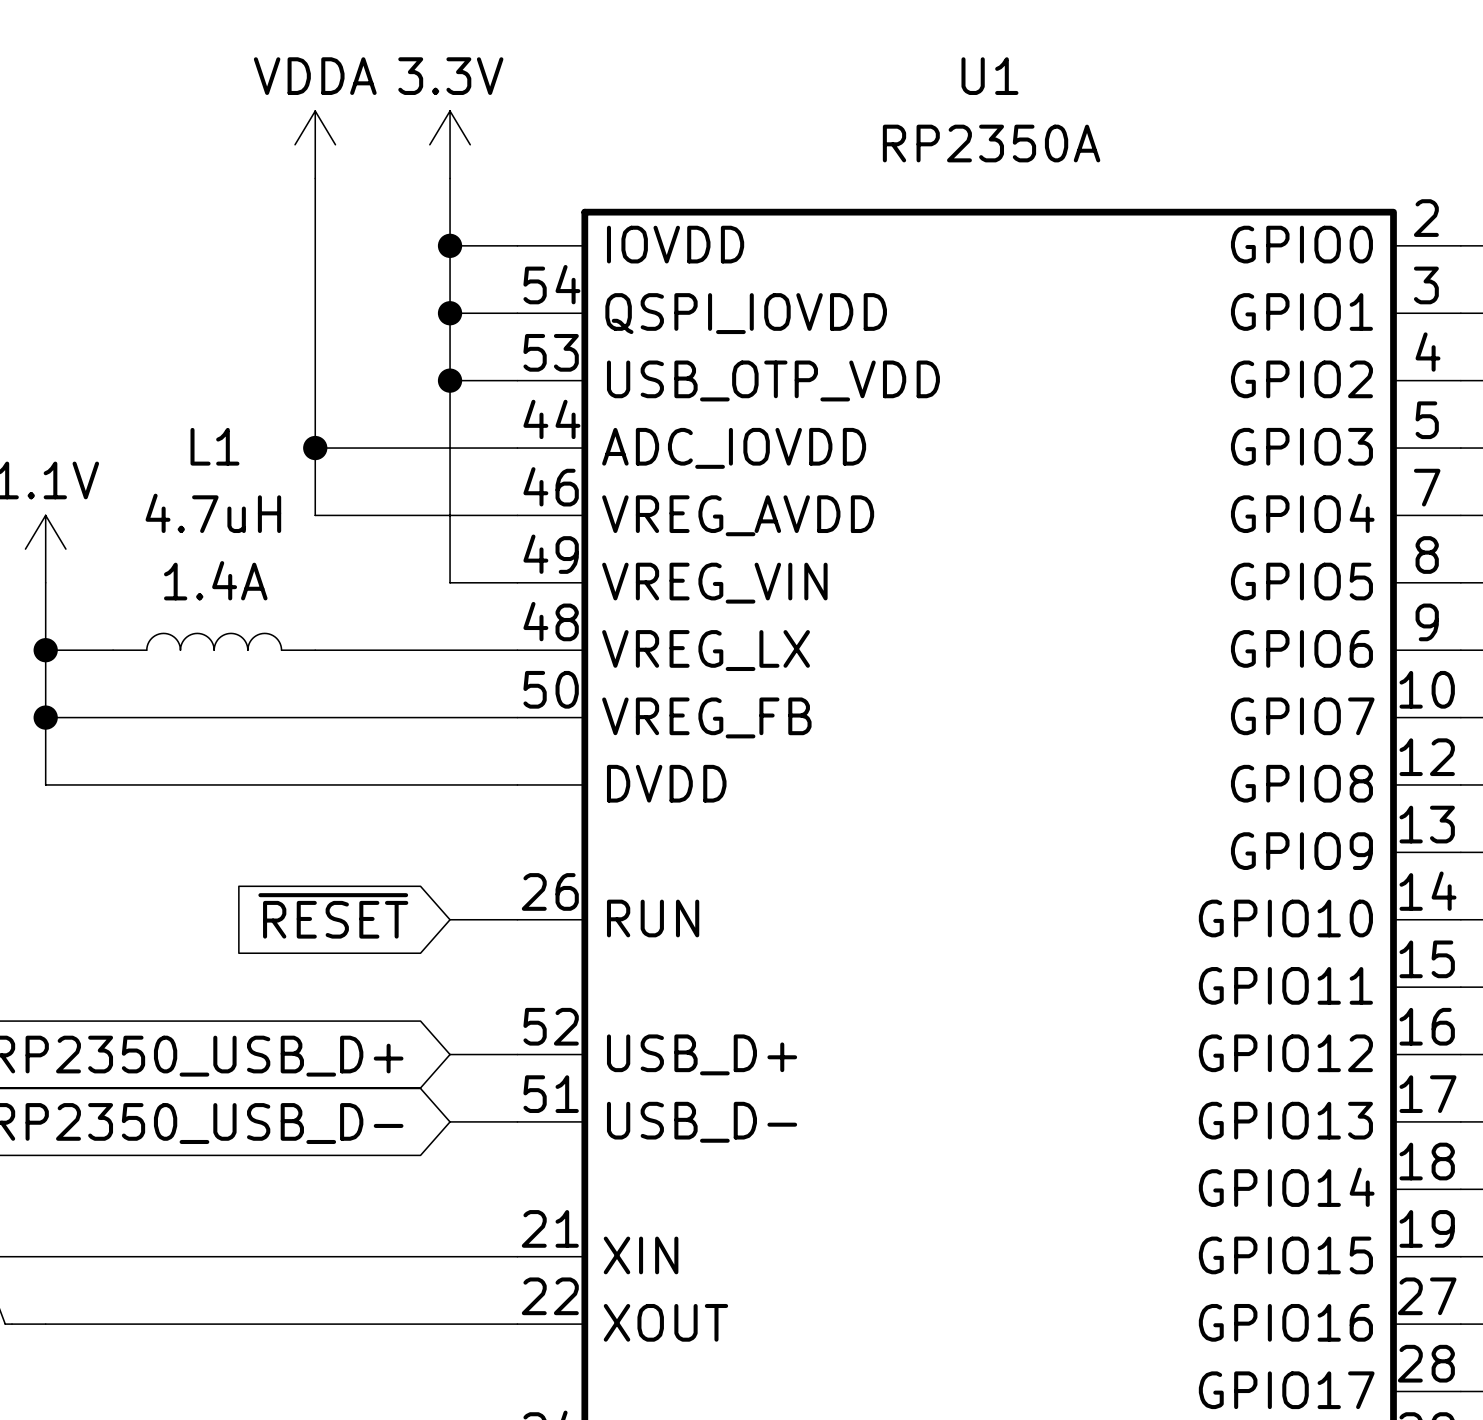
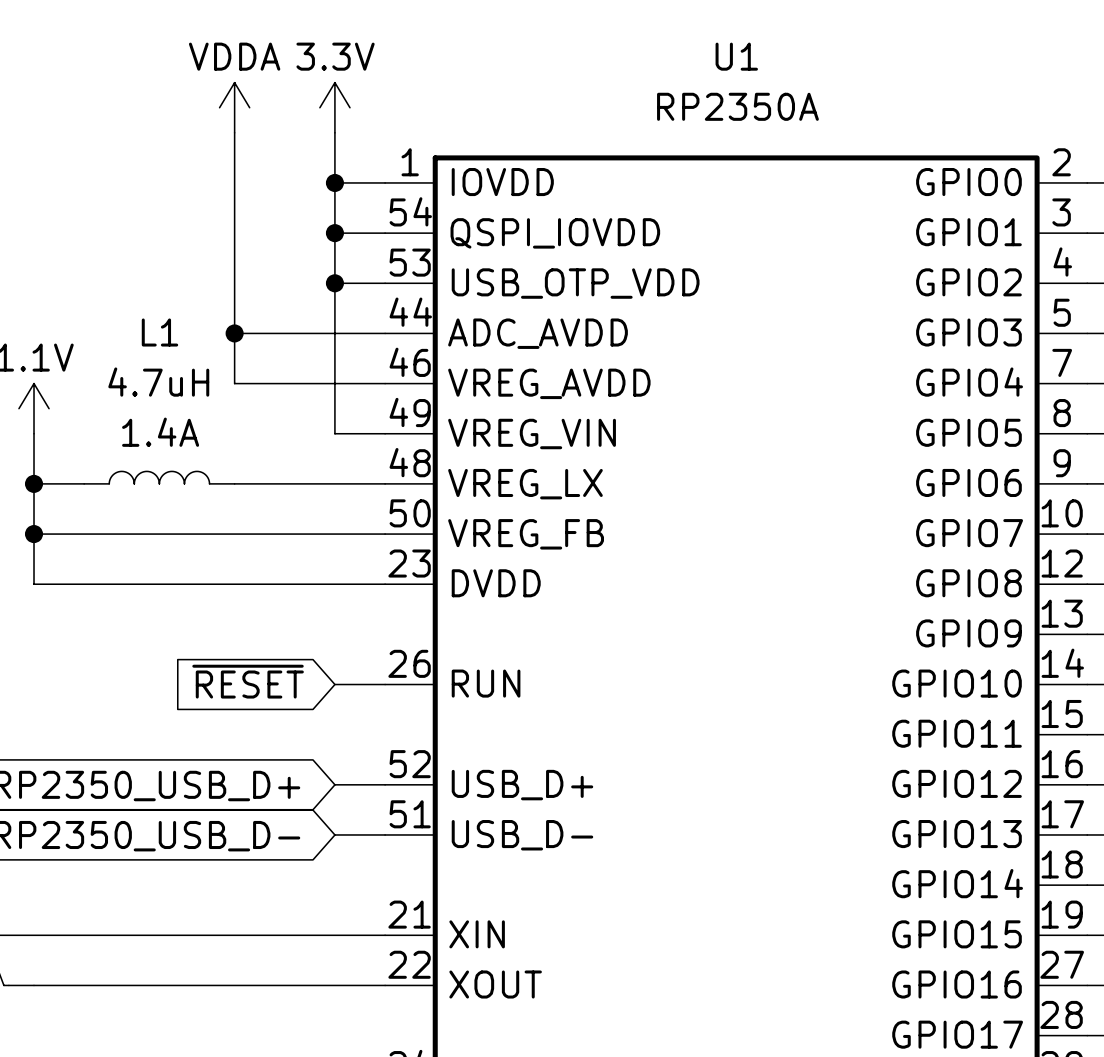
U1 pin number: none -> 1 (410, 162)
U1 pin name: ADC_IOVDD (734, 448) -> ADC_AVDD (538, 333)
U1 pin number: none -> 23 (409, 563)

